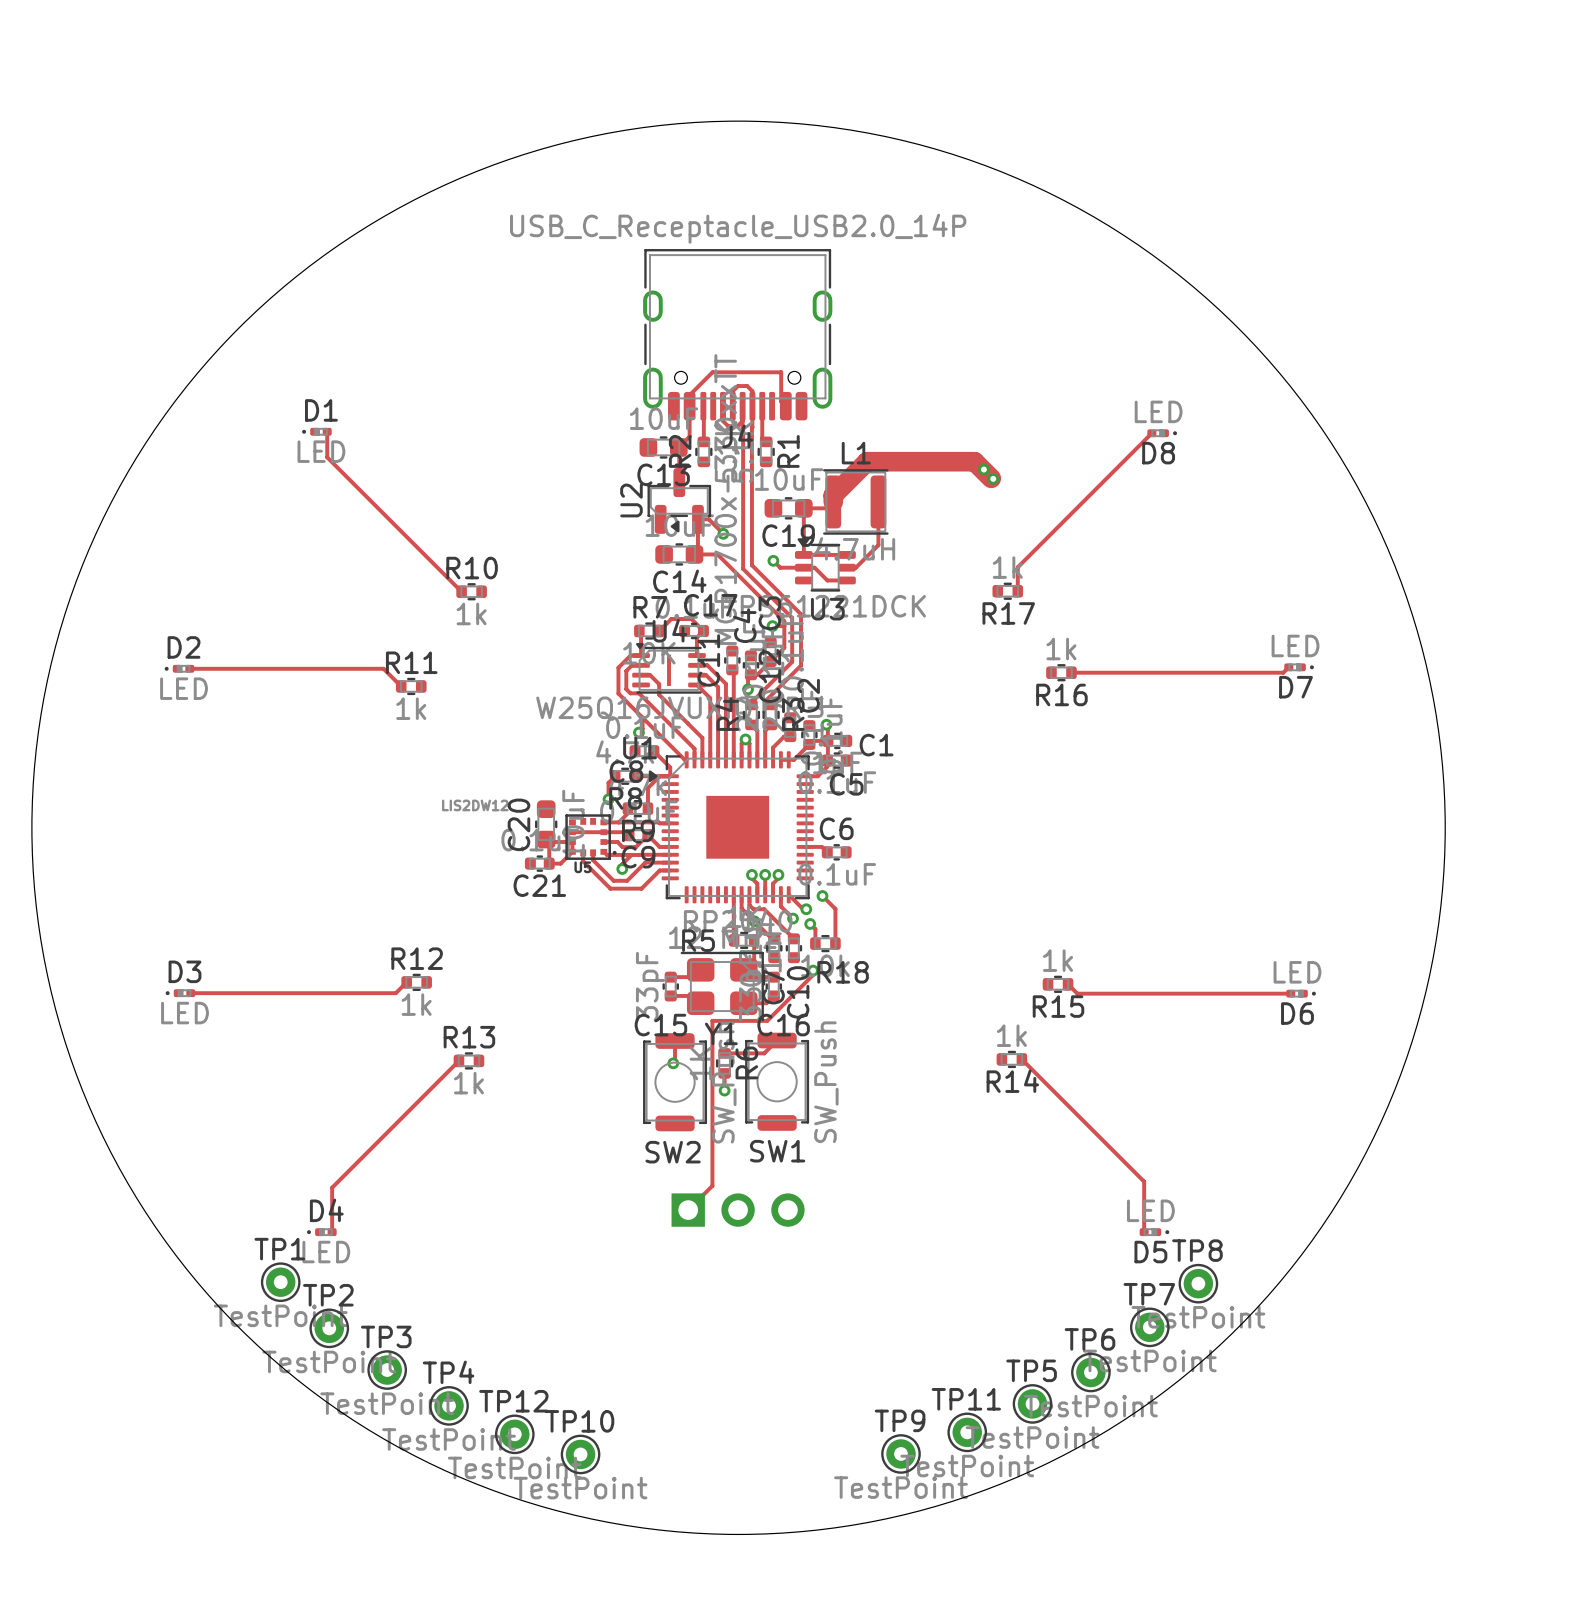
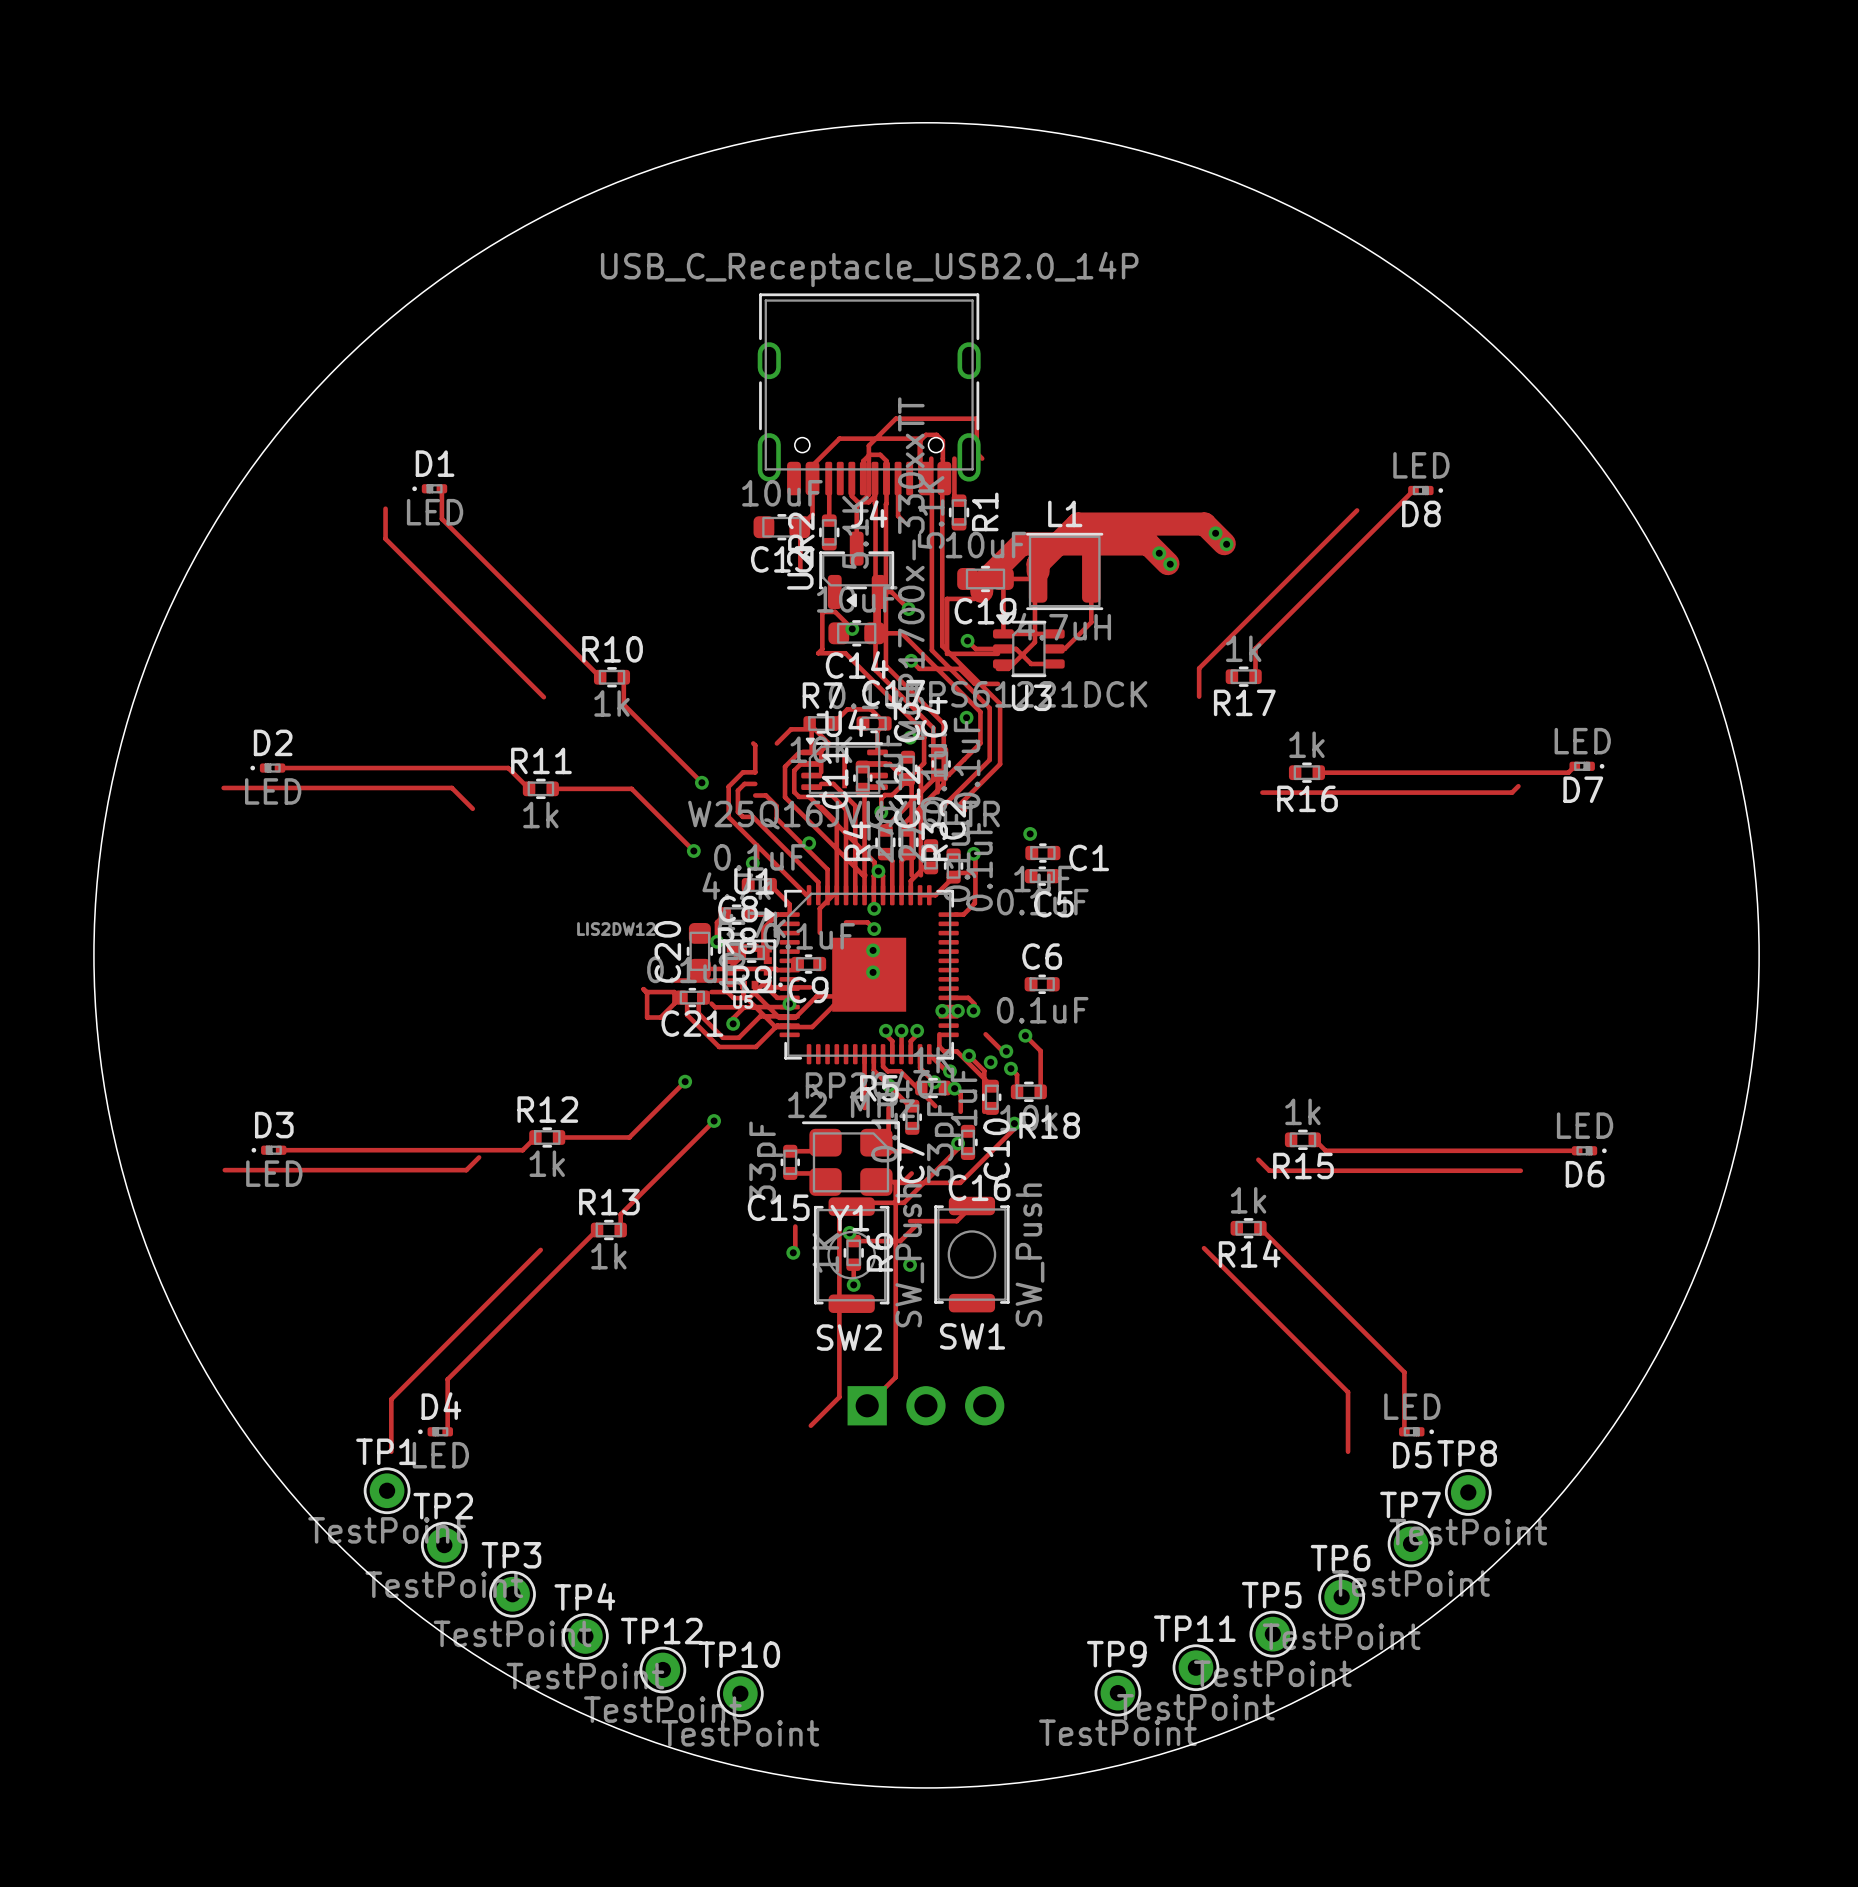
track: none -> (919, 458) (919, 441) (925, 434) (936, 434) (942, 441) (942, 646) (1000, 703) (1000, 764) (959, 805) (964, 810)
track: none -> (931, 458) (931, 650) (989, 708) (989, 759) (941, 806) (941, 810)
track: none -> (954, 458) (954, 496) (959, 500)
track: none -> (982, 458) (976, 453) (976, 418) (895, 418) (868, 445) (868, 494) (856, 507) (856, 548)
track: none -> (441, 488) (441, 518) (600, 677)
track: none -> (1413, 490) (1255, 648) (1255, 676)
D1 position: (316, 431) -> (429, 488)
D8 position: (1162, 433) -> (1425, 490)
R1 position: (766, 451) -> (959, 512)
via: none -> (1215, 533)
track: none -> (1224, 543) (1204, 524) (1077, 524) (1038, 563) (1038, 571) (1030, 578) (1003, 578) (1003, 633) (1054, 633)
via: none -> (1226, 544)
track: none -> (1091, 571) (1091, 622) (1064, 648) (1054, 648)
U2 position: (679, 500) -> (856, 570)
L1 position: (855, 501) -> (1064, 571)
C19 position: (788, 508) -> (985, 578)
track: none -> (908, 609) (891, 591) (878, 591) (878, 629) (874, 633) (901, 633) (980, 711) (980, 743) (948, 775) (941, 775) (937, 778) (937, 792)
via: none -> (908, 609)
track: none -> (967, 640) (975, 648) (1016, 648) (1031, 663) (1054, 663)
via: none -> (967, 640)
C14 position: (679, 554) -> (856, 633)
U3 position: (825, 564) -> (1028, 645)
track: none -> (623, 677) (623, 704) (701, 782)
R10 position: (471, 591) -> (612, 677)
R17 position: (1007, 591) -> (1243, 676)
via: none -> (966, 717)
track: none -> (809, 723) (811, 725) (811, 752) (799, 752) (785, 766) (785, 797) (863, 875) (865, 875)
track: none -> (833, 723) (847, 709) (871, 709) (885, 723) (877, 731) (877, 752)
R7 position: (649, 631) -> (821, 723)
C17 position: (694, 631) -> (874, 723)
track: none -> (811, 763) (800, 763) (794, 770) (794, 792) (799, 796) (809, 796) (874, 862) (874, 875)
track: none -> (877, 763) (889, 763) (911, 785) (911, 875)
track: none -> (1574, 766) (1568, 772) (1318, 772)
track: none -> (280, 768) (508, 768) (529, 788)
track: none -> (919, 769) (920, 771) (920, 875)
via: none -> (701, 782)
C4 position: (750, 665) -> (941, 763)
D7 position: (1299, 667) -> (1586, 766)
D2 position: (179, 668) -> (267, 768)
U4 position: (669, 668) -> (844, 767)
track: none -> (552, 788) (631, 788) (693, 850)
R16 position: (1061, 672) -> (1306, 772)
R11 position: (411, 686) -> (540, 788)
via: none -> (1030, 833)
via: none -> (809, 843)
via: none -> (693, 850)
C1 position: (837, 740) -> (1042, 853)
track: none -> (833, 894) (819, 908) (819, 932)
C5 position: (836, 760) -> (1042, 876)
via: none -> (874, 908)
track: none -> (846, 922) (867, 922) (874, 929)
via: none -> (874, 929)
via: none -> (873, 950)
C20 position: (546, 824) -> (699, 951)
via: none -> (873, 972)
round board edge position: (738, 827) -> (926, 955)
track: none -> (767, 983) (771, 987) (810, 987)
track: none -> (743, 984) (743, 995) (775, 1027) (812, 1027) (833, 1005) (846, 1005)
C9 position: (638, 835) -> (808, 964)
track: none -> (755, 984) (755, 993) (779, 1017) (795, 1017) (816, 996) (846, 996)
U5 position: (590, 837) -> (752, 966)
via: none -> (789, 1003)
C6 position: (836, 852) -> (1042, 984)
via: none -> (942, 1010)
via: none -> (957, 1010)
via: none -> (973, 1010)
C21 position: (539, 863) -> (692, 997)
track: none -> (939, 1034) (939, 1046) (944, 1051) (956, 1051) (991, 1086)
track: none -> (985, 1034) (1002, 1051) (1006, 1051)
track: none -> (1025, 1035) (1040, 1050) (1040, 1091)
via: none -> (1025, 1035)
via: none -> (1006, 1051)
via: none -> (990, 1062)
track: none -> (1010, 1068) (1017, 1074) (1017, 1091)
via: none -> (1010, 1068)
track: none -> (685, 1081) (629, 1137) (559, 1137)
via: none -> (685, 1081)
R5 position: (744, 940) -> (933, 1088)
R18 position: (825, 943) -> (1028, 1091)
C10 position: (793, 948) -> (991, 1097)
track: none -> (714, 1121) (620, 1214) (620, 1230)
via: none -> (714, 1121)
track: none -> (1014, 1123) (1014, 1128) (960, 1182) (895, 1182) (895, 1377) (867, 1405)
via: none -> (1014, 1123)
track: none -> (535, 1137) (522, 1150) (281, 1150)
track: none -> (1314, 1139) (1325, 1150) (1577, 1150)
R12 position: (416, 982) -> (547, 1137)
R15 position: (1058, 984) -> (1302, 1139)
C16 position: (773, 986) -> (968, 1142)
D3 position: (180, 993) -> (269, 1150)
D6 position: (1301, 993) -> (1589, 1150)
track: none -> (971, 1206) (956, 1221) (910, 1221)
track: none -> (1260, 1228) (1404, 1372) (1404, 1431)
track: none -> (597, 1230) (447, 1379) (447, 1431)
via: none -> (849, 1232)
R14 position: (1011, 1059) -> (1248, 1228)
R13 position: (468, 1060) -> (608, 1230)
via: none -> (910, 1264)
SW1 position: (777, 1081) -> (971, 1254)
SW2 position: (675, 1082) -> (851, 1255)
part position: (738, 1210) -> (925, 1405)
D4 position: (321, 1232) -> (435, 1431)
D5 position: (1154, 1232) -> (1416, 1431)
TP1 position: (280, 1282) -> (387, 1490)
TP8 position: (1198, 1283) -> (1468, 1492)
TP7 position: (1149, 1327) -> (1411, 1543)
TP2 position: (329, 1328) -> (444, 1545)
TP3 position: (387, 1370) -> (512, 1594)
TP6 position: (1090, 1372) -> (1341, 1597)
TP5 position: (1032, 1403) -> (1272, 1634)
TP4 position: (449, 1405) -> (585, 1636)
TP11 position: (967, 1432) -> (1195, 1667)
TP12 position: (514, 1434) -> (662, 1669)
TP9 position: (901, 1453) -> (1117, 1693)
TP10 position: (580, 1454) -> (740, 1693)

